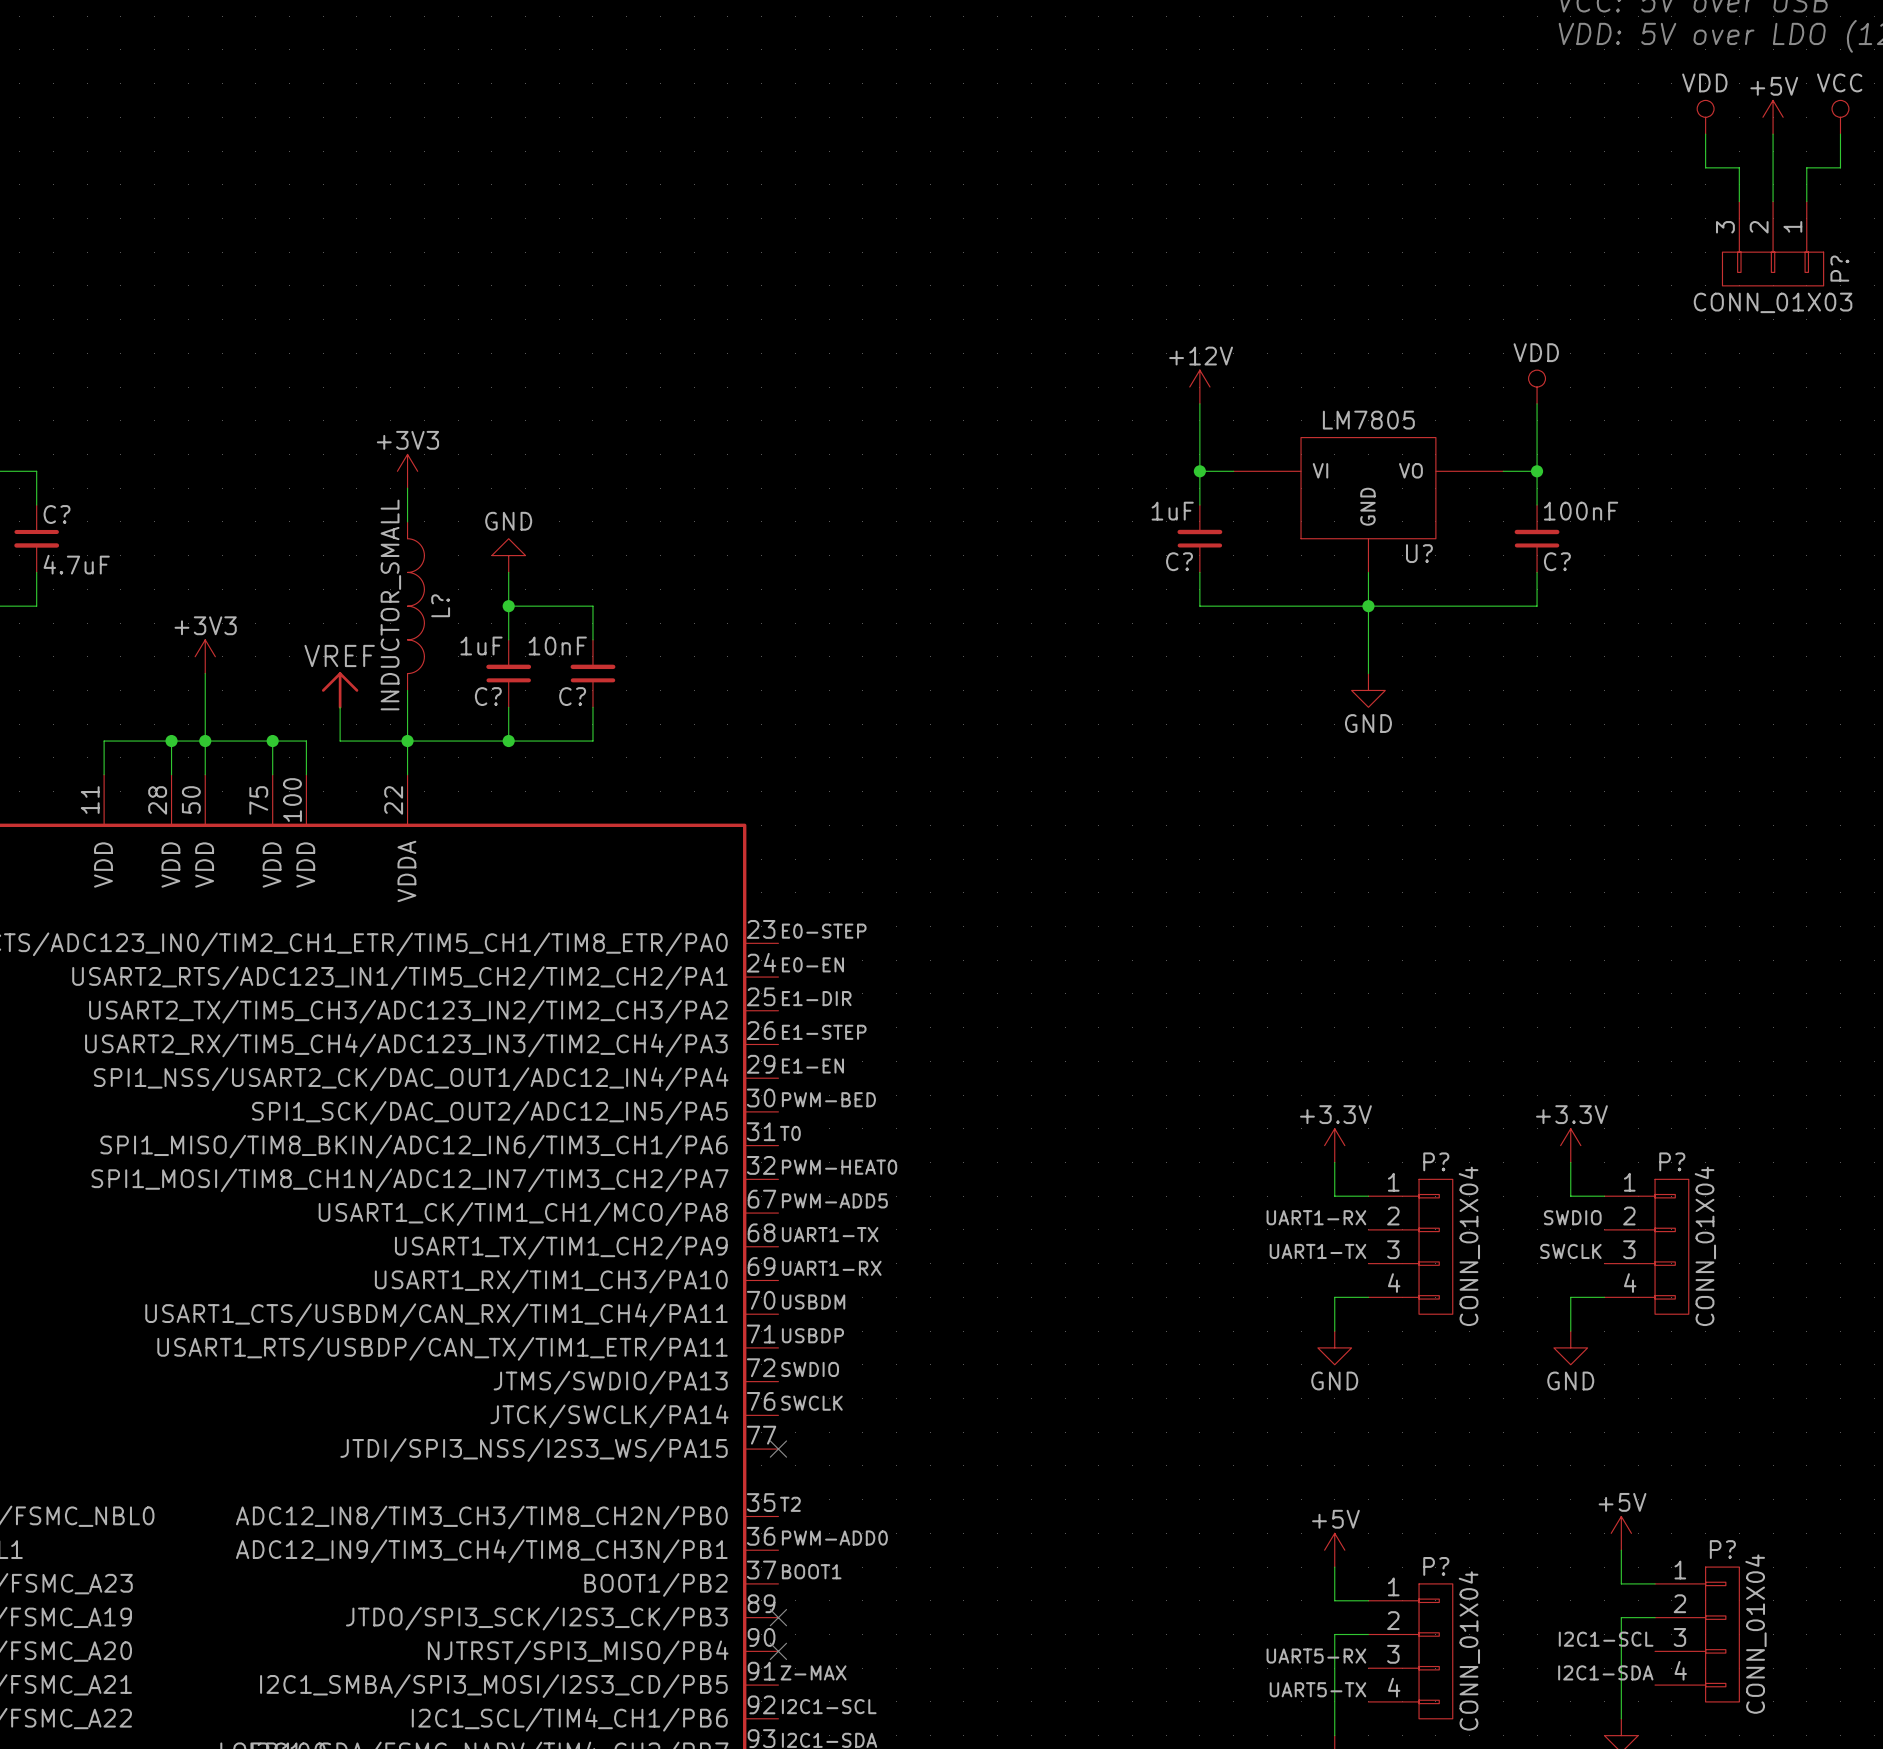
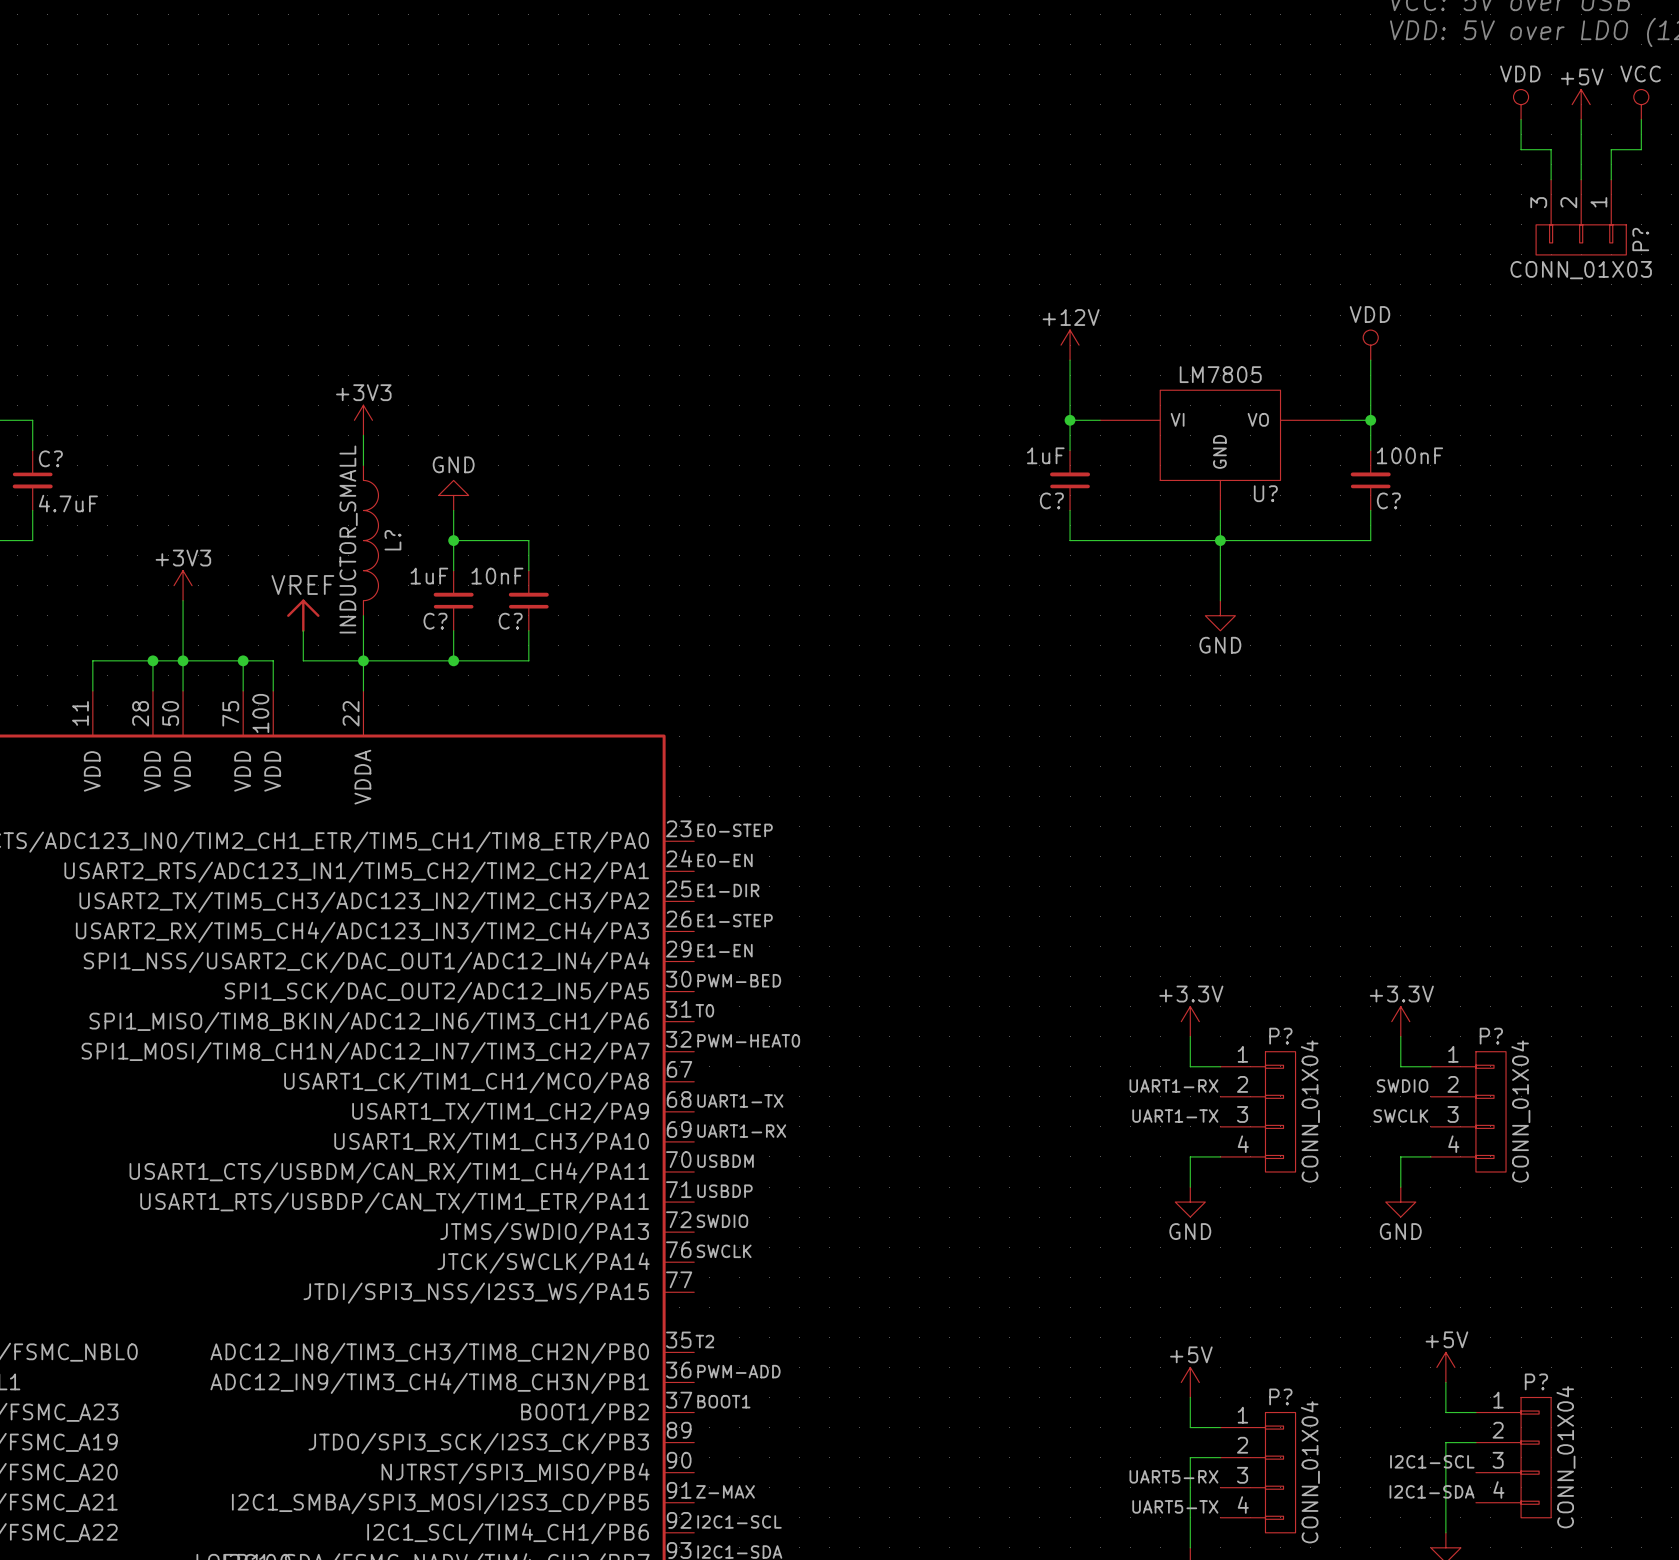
label: PWM-ADD5 (834, 1200) -> none
no-connect mark: (778, 1449) -> none
label: PWM-ADD0 (834, 1538) -> PWM-ADD (738, 1371)
no-connect mark: (778, 1617) -> none
no-connect mark: (778, 1651) -> none

